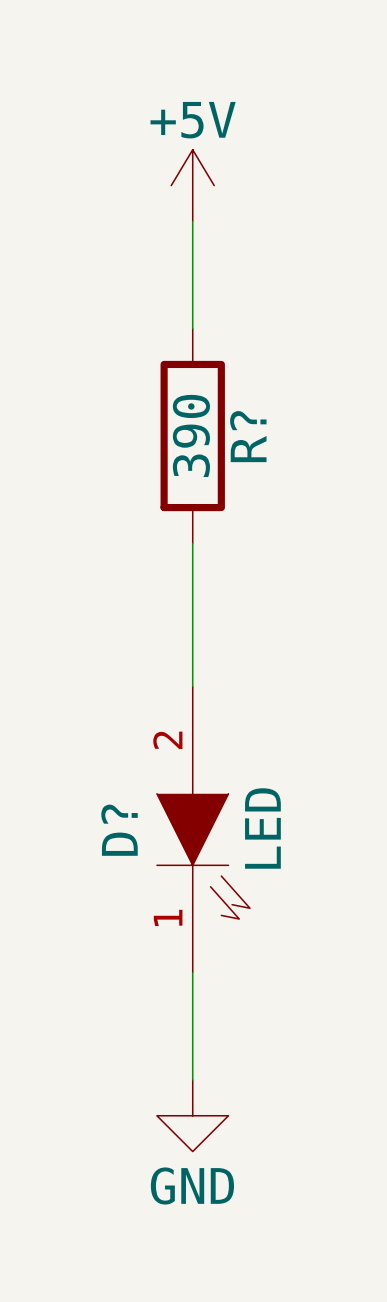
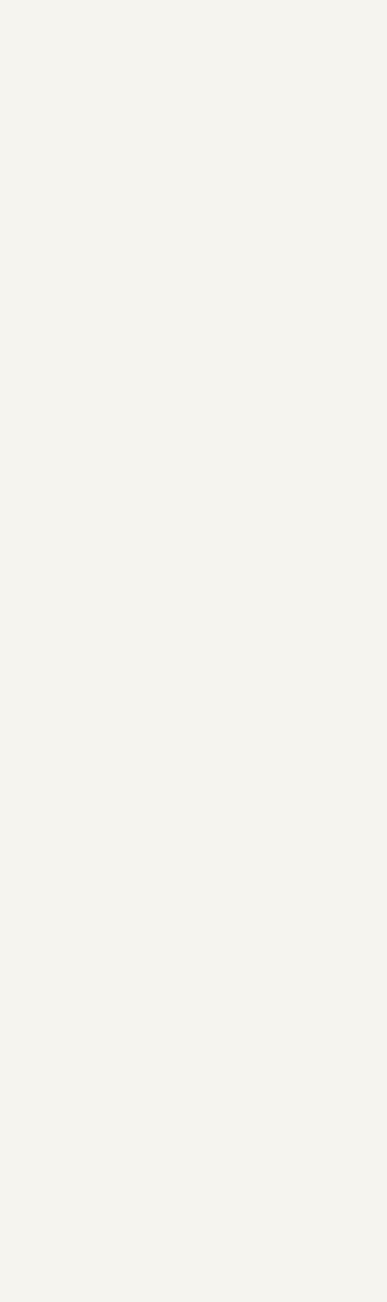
power symbol: +5V (192, 185) -> none
wire: (192, 221) (192, 328) -> none
R?: 390 (192, 436) -> none
wire: (192, 543) (192, 686) -> none
D?: LED (203, 829) -> none
wire: (192, 972) (192, 1079) -> none
power symbol: GND (192, 1115) -> none

